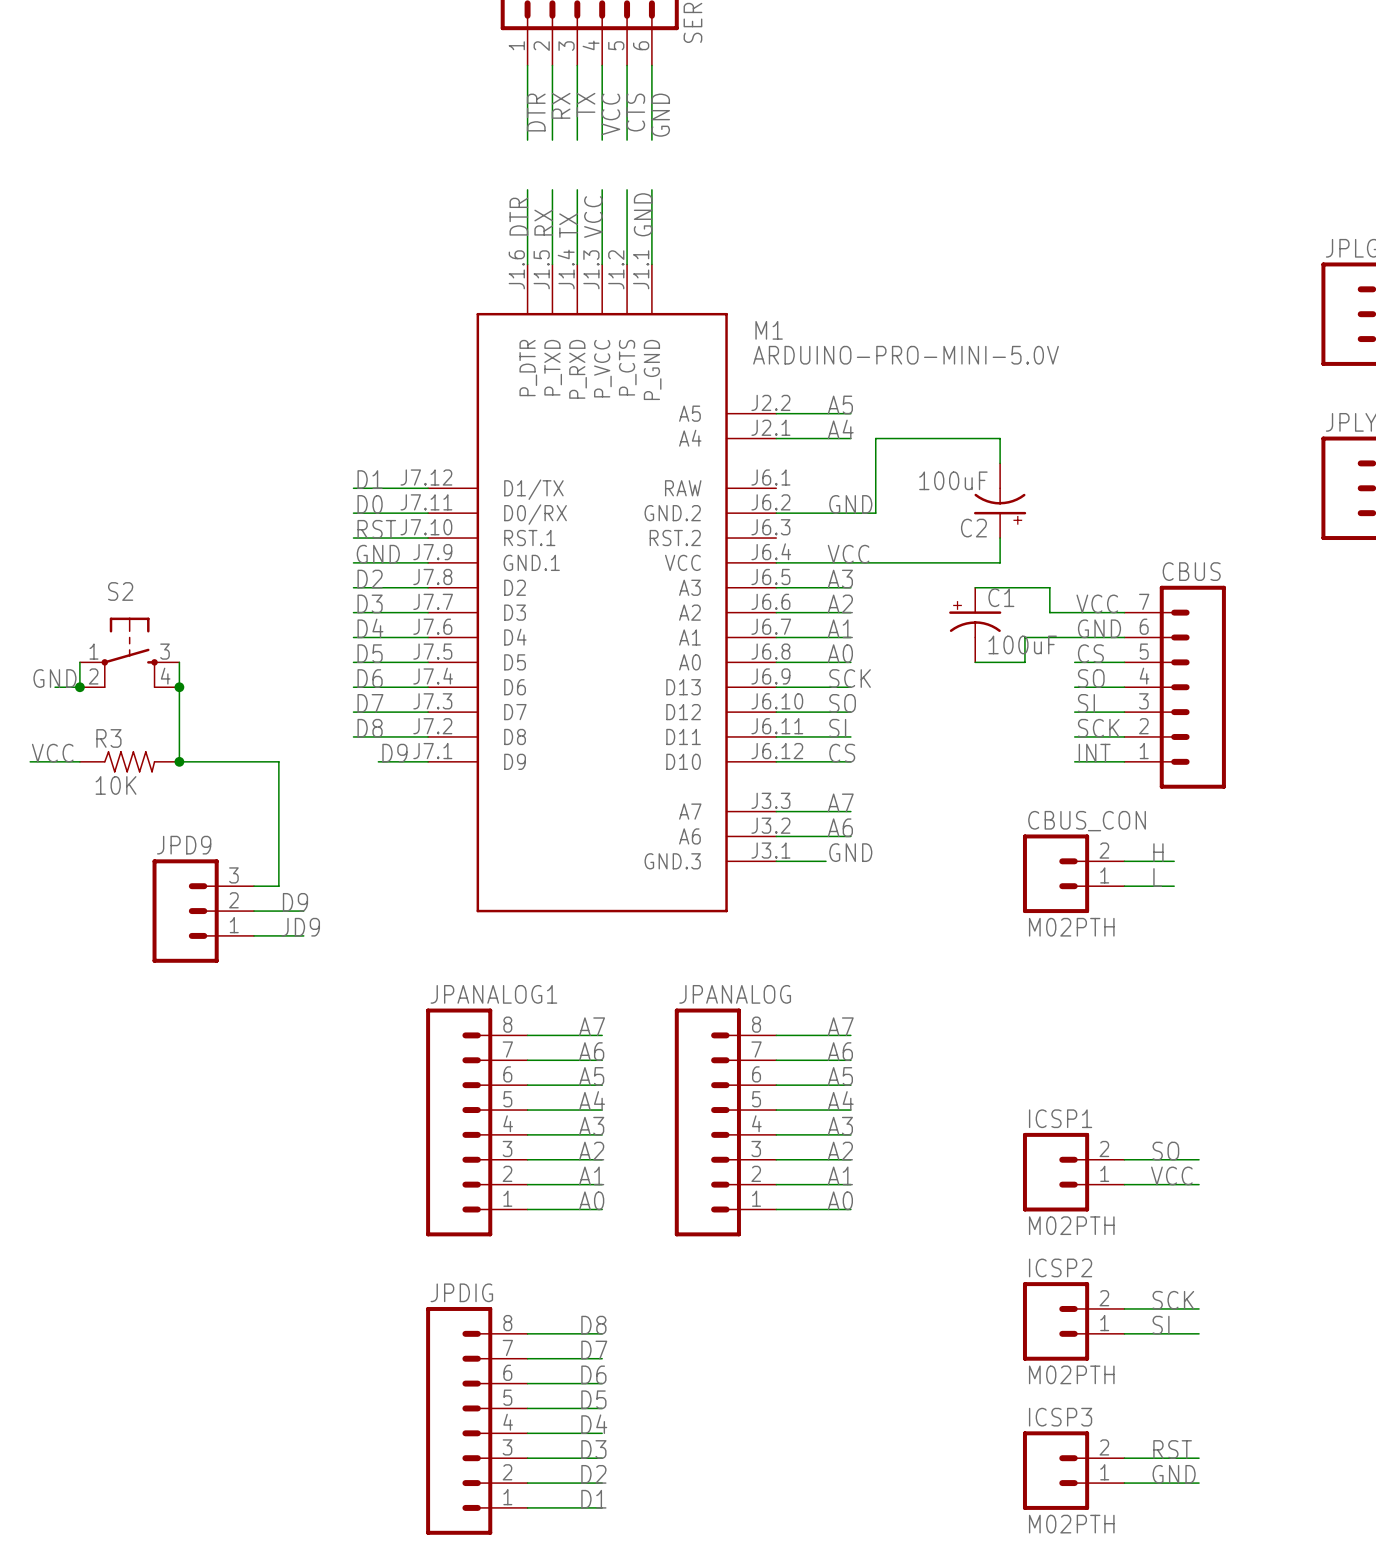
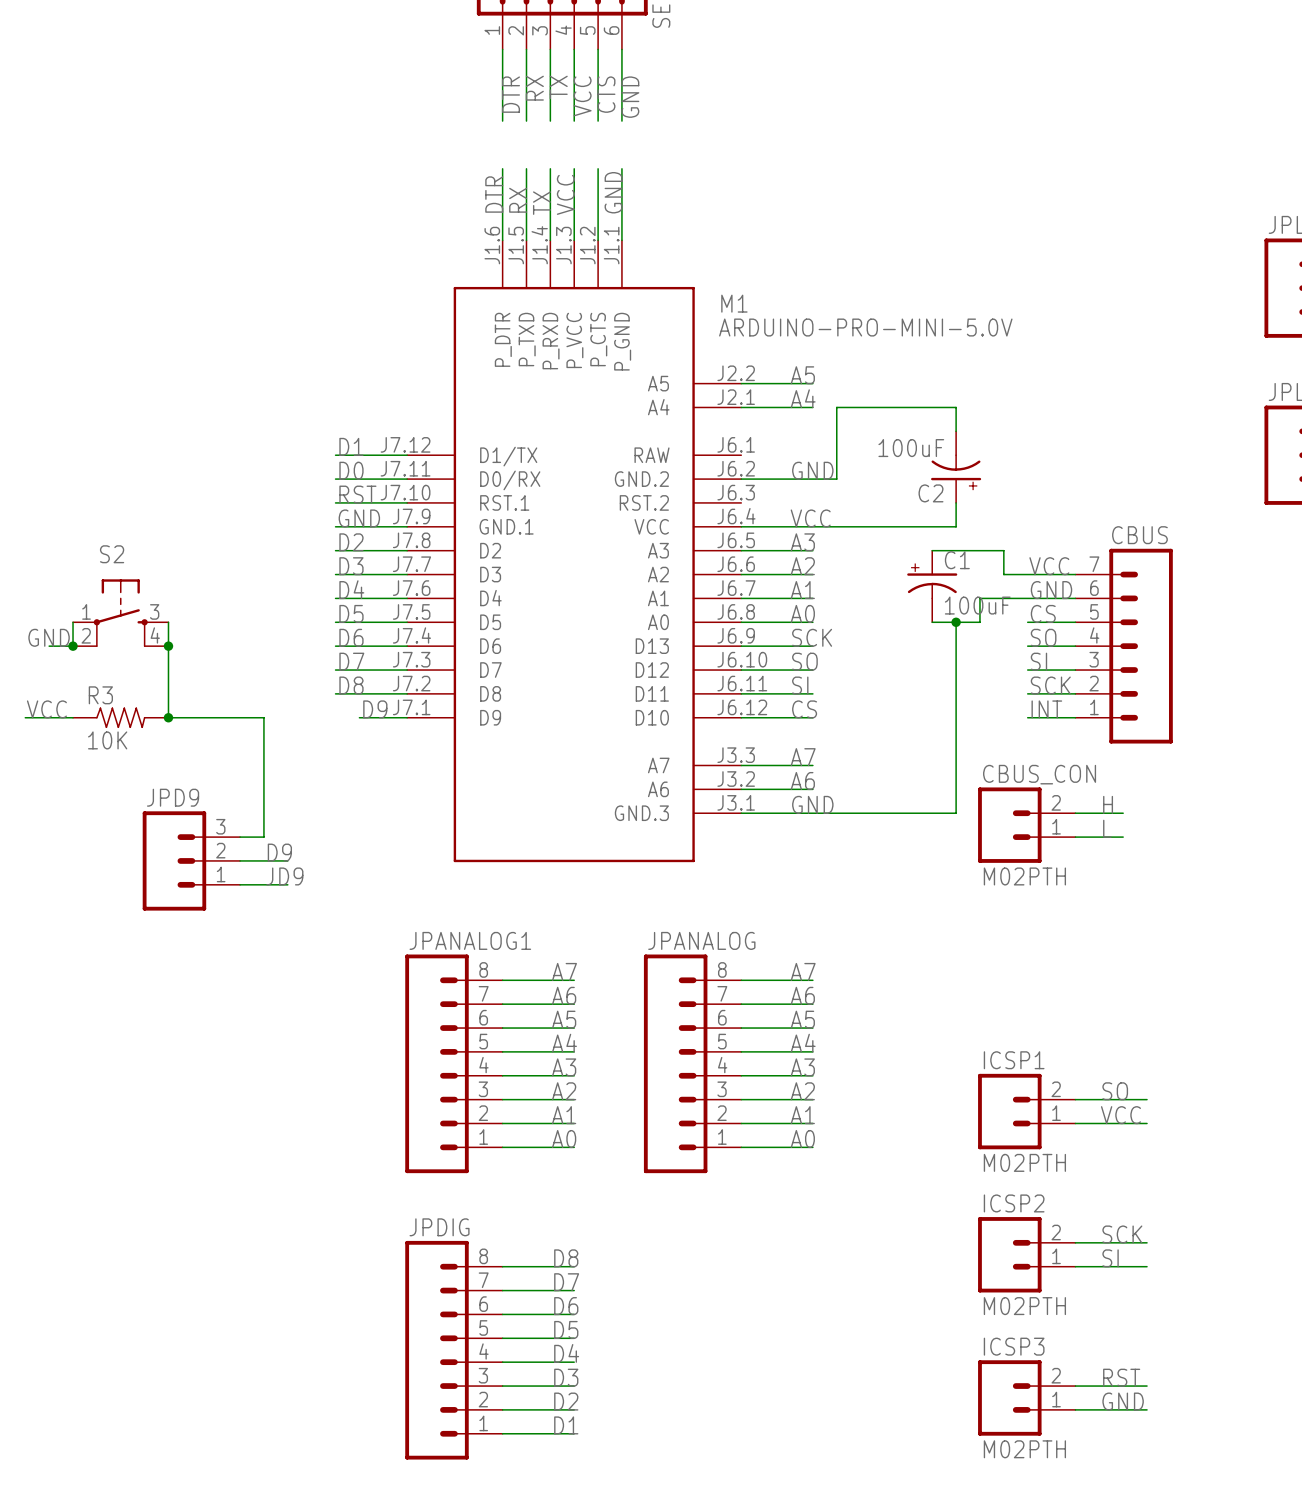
wire: none -> (956, 622) (956, 813) (789, 813)
junction: none -> (956, 622)

